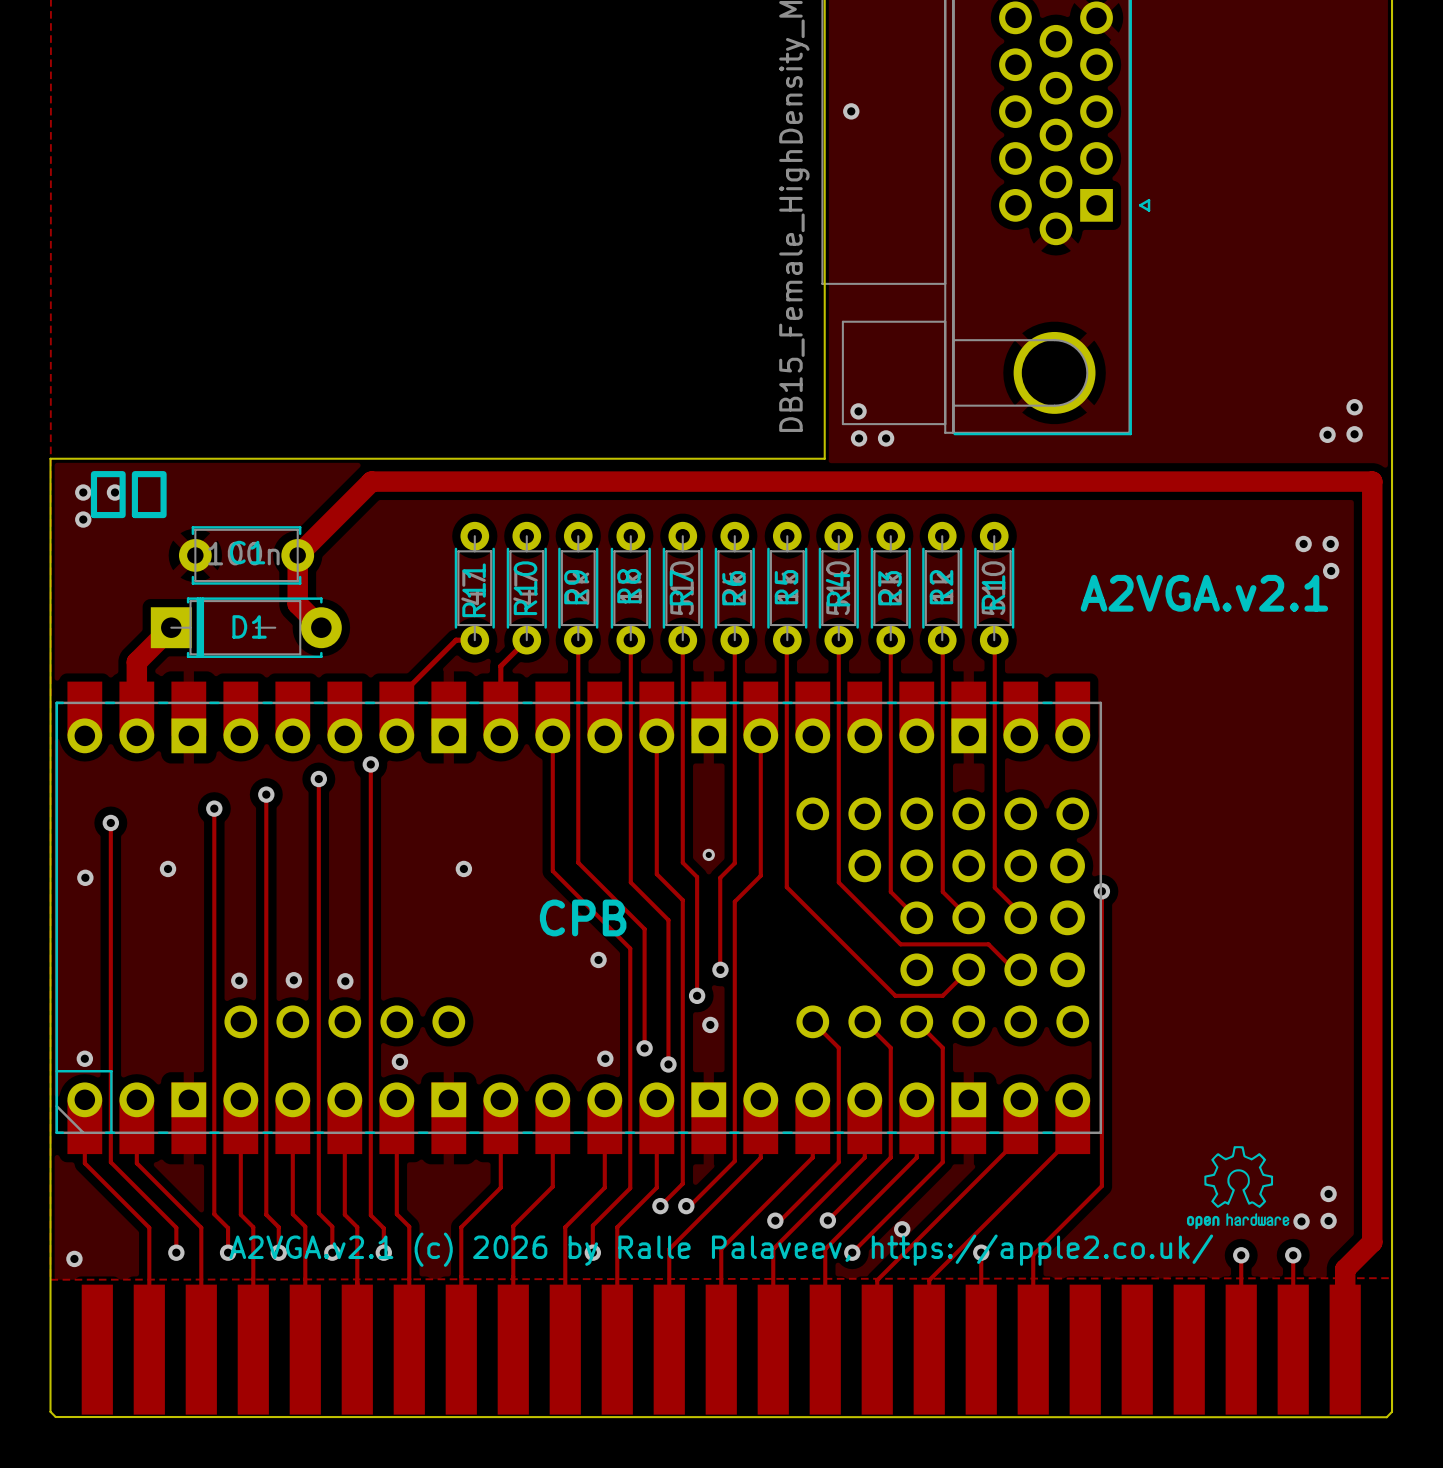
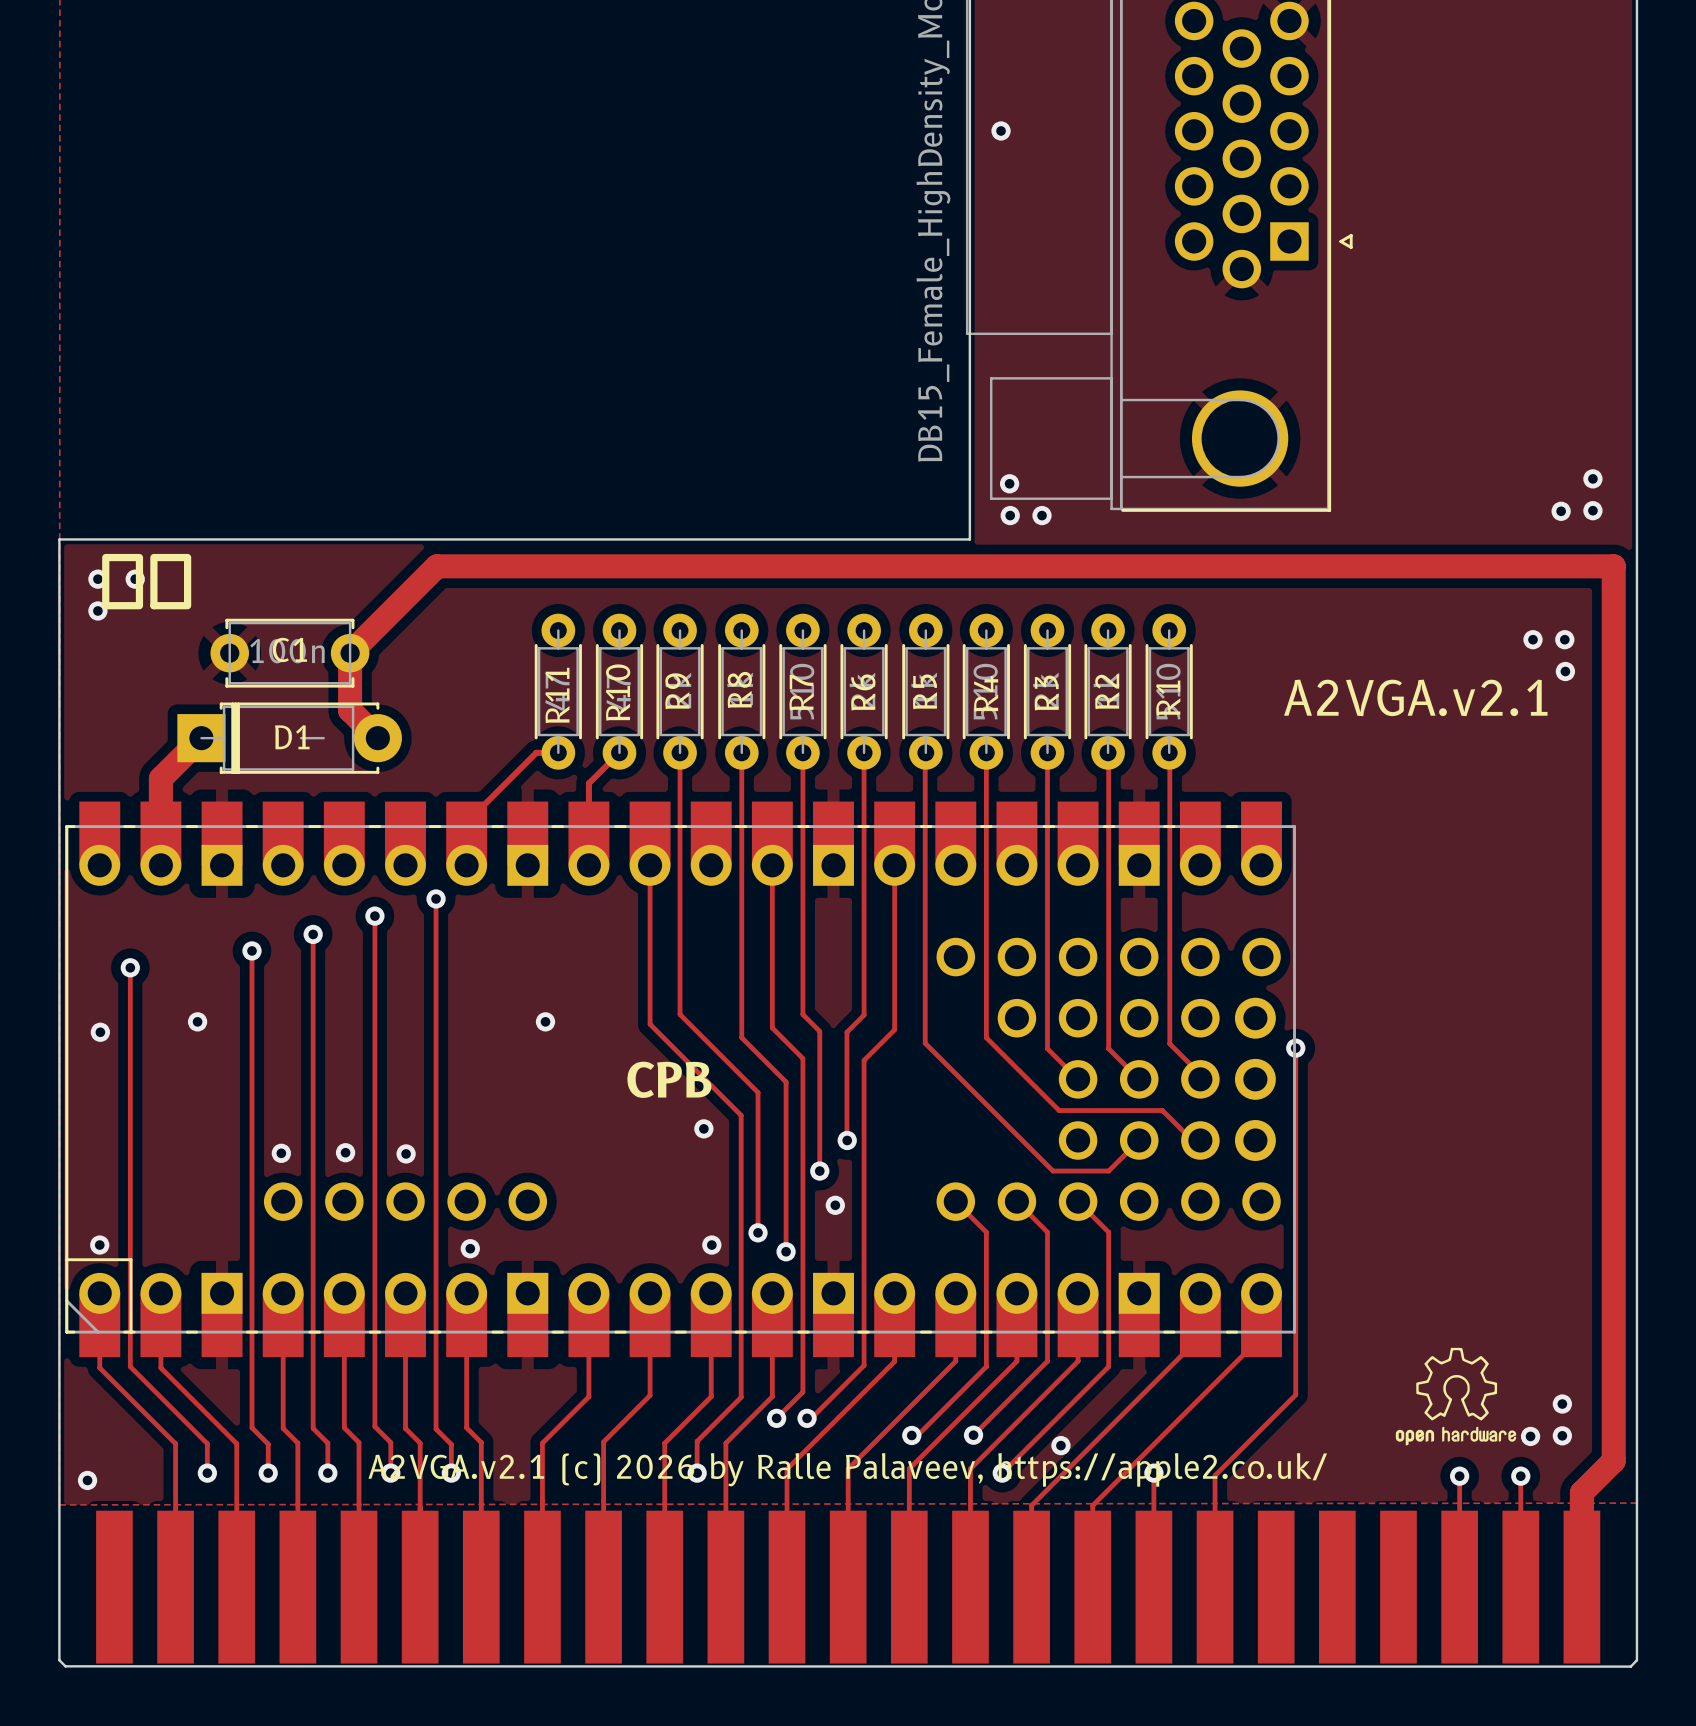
via: (708, 854) -> none

